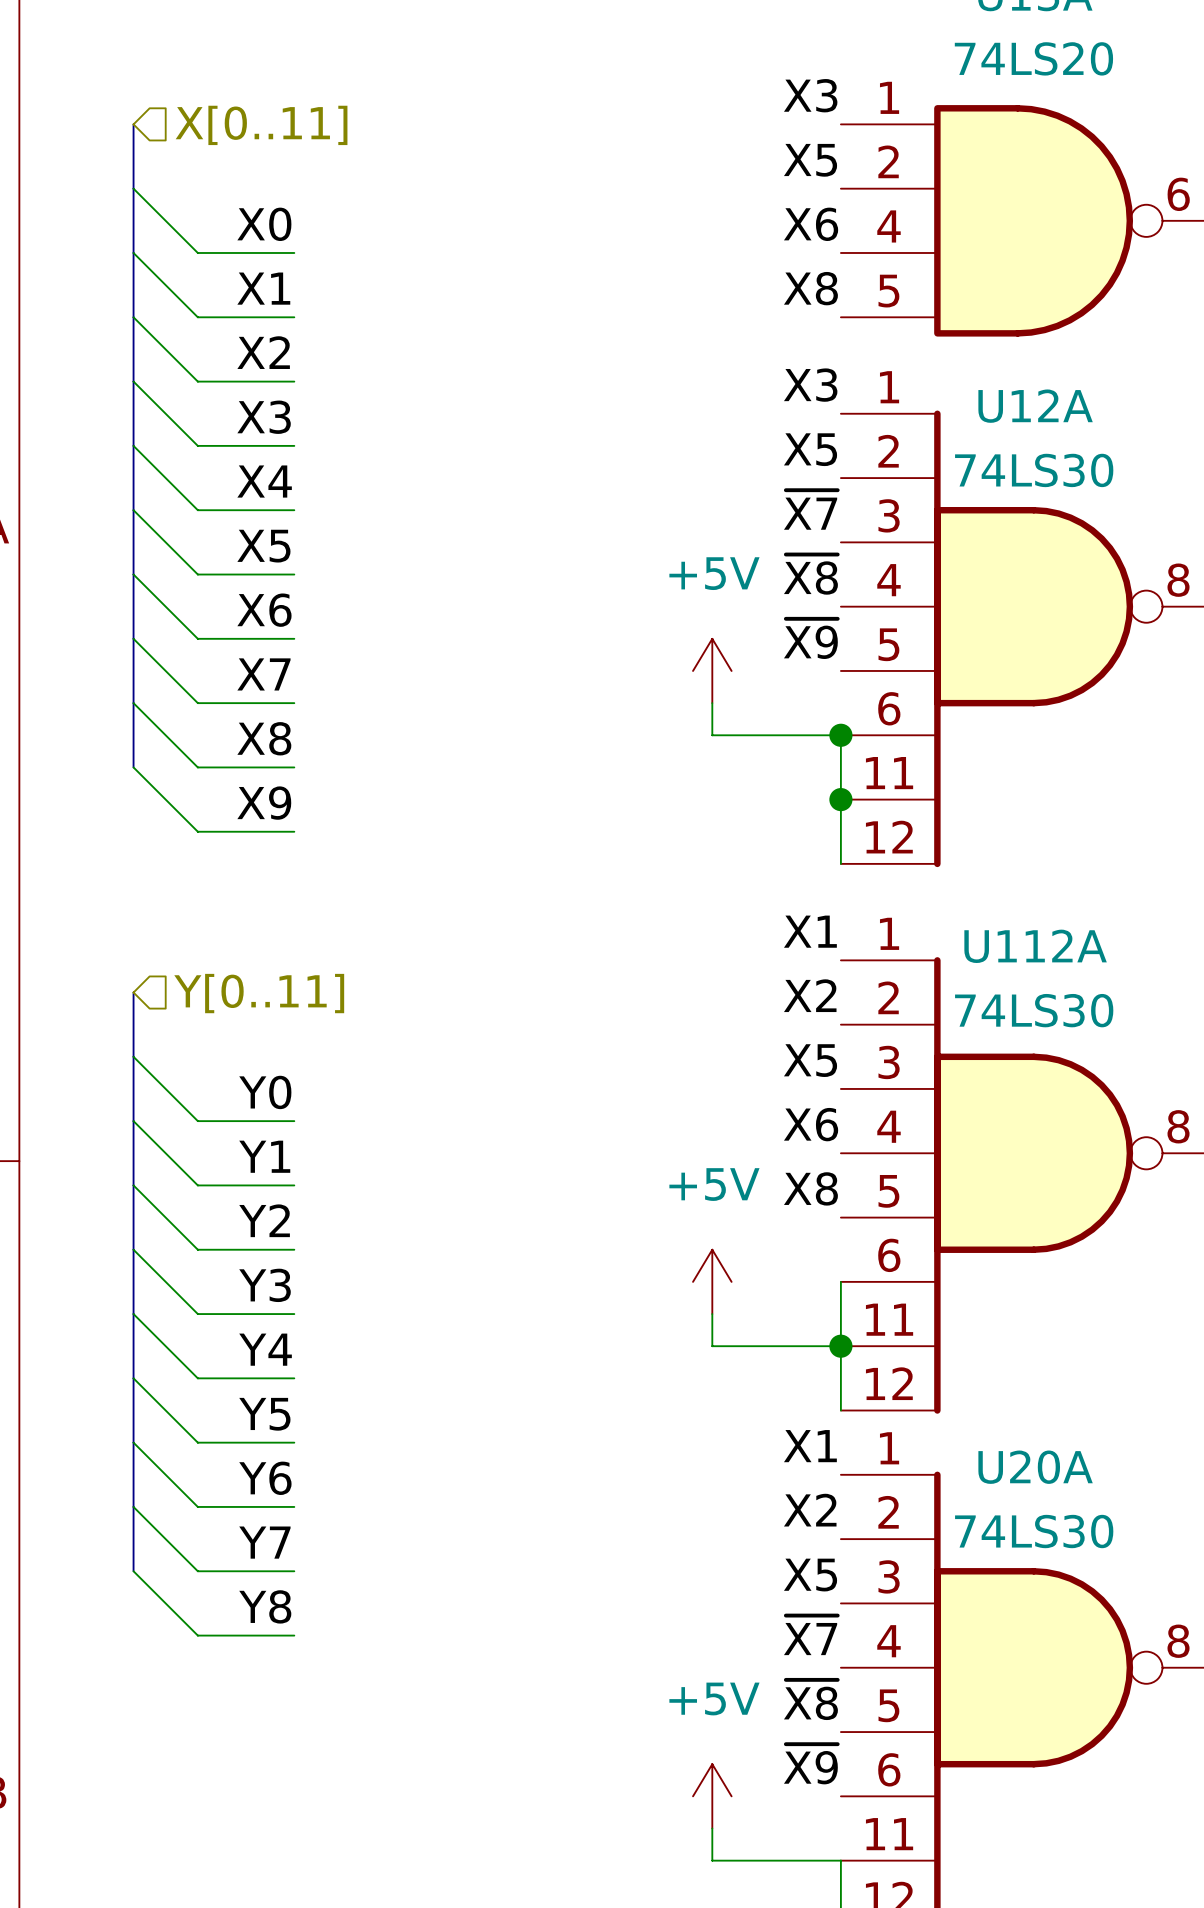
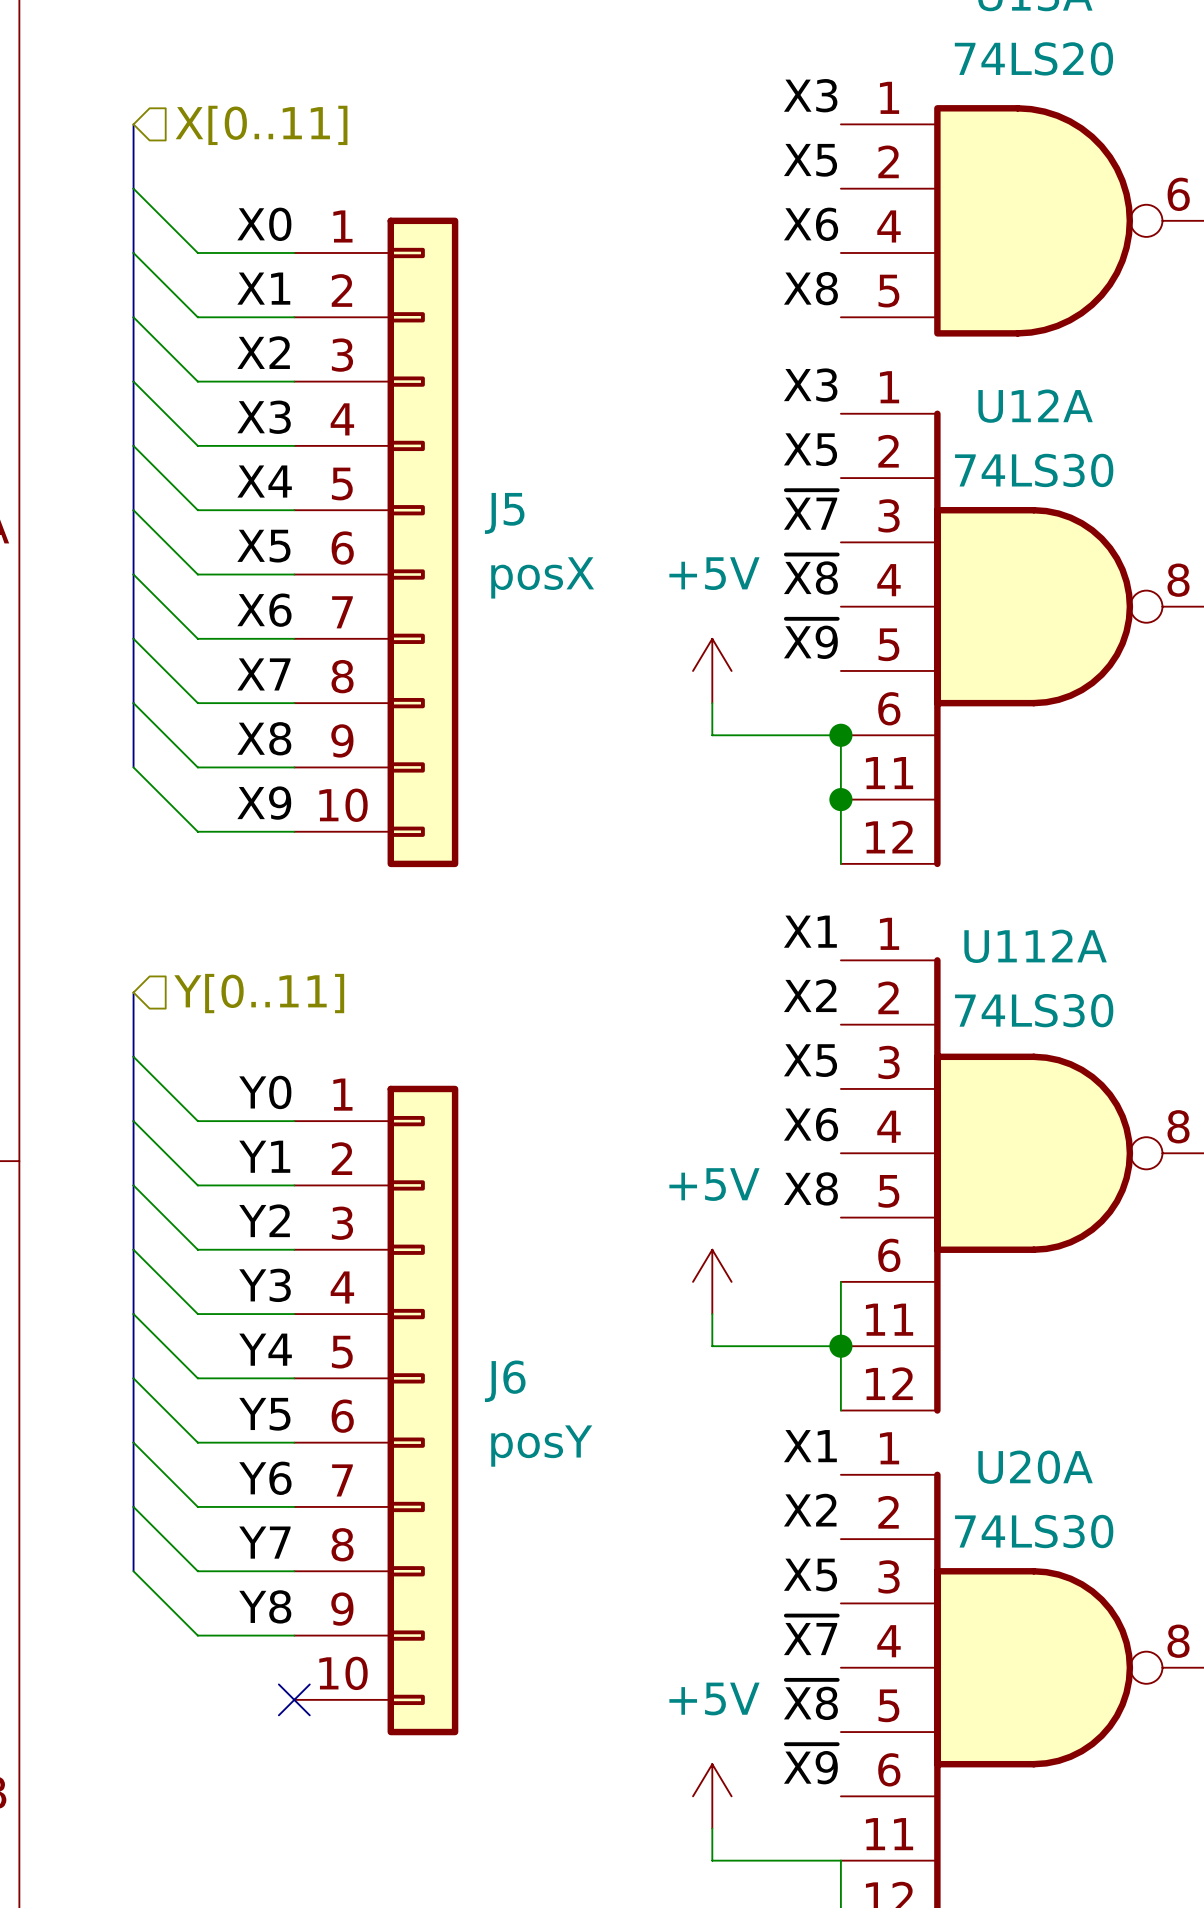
J5: none -> posX (376, 542)
J6: none -> posY (376, 1410)
no-connect mark: none -> (294, 1699)

